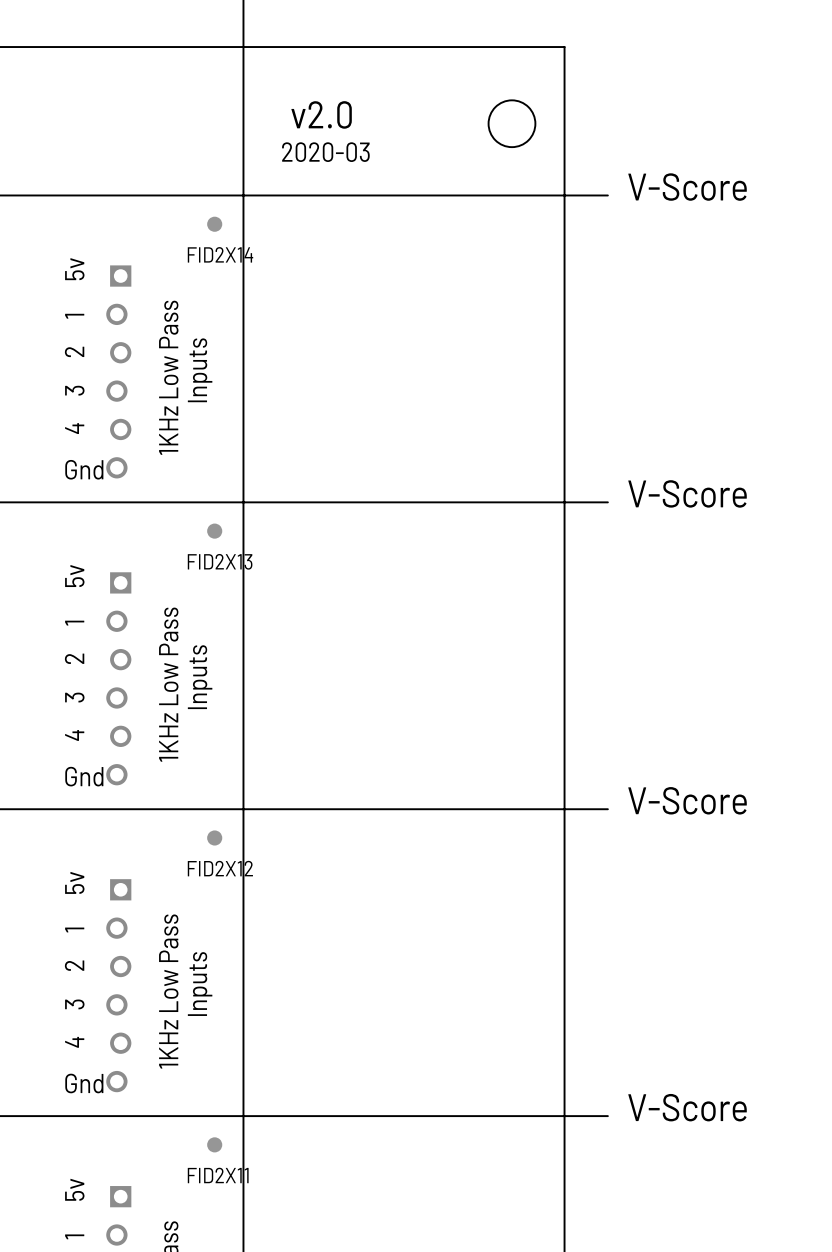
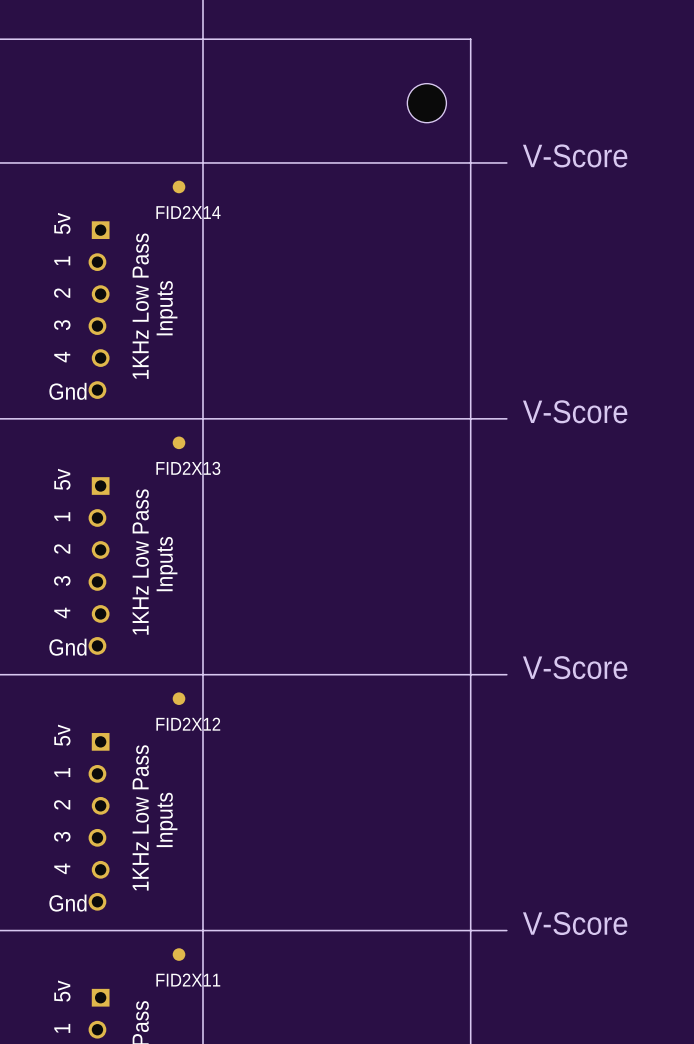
text: v2.0 (321, 114) -> none
text: 2020-03 (325, 152) -> none

